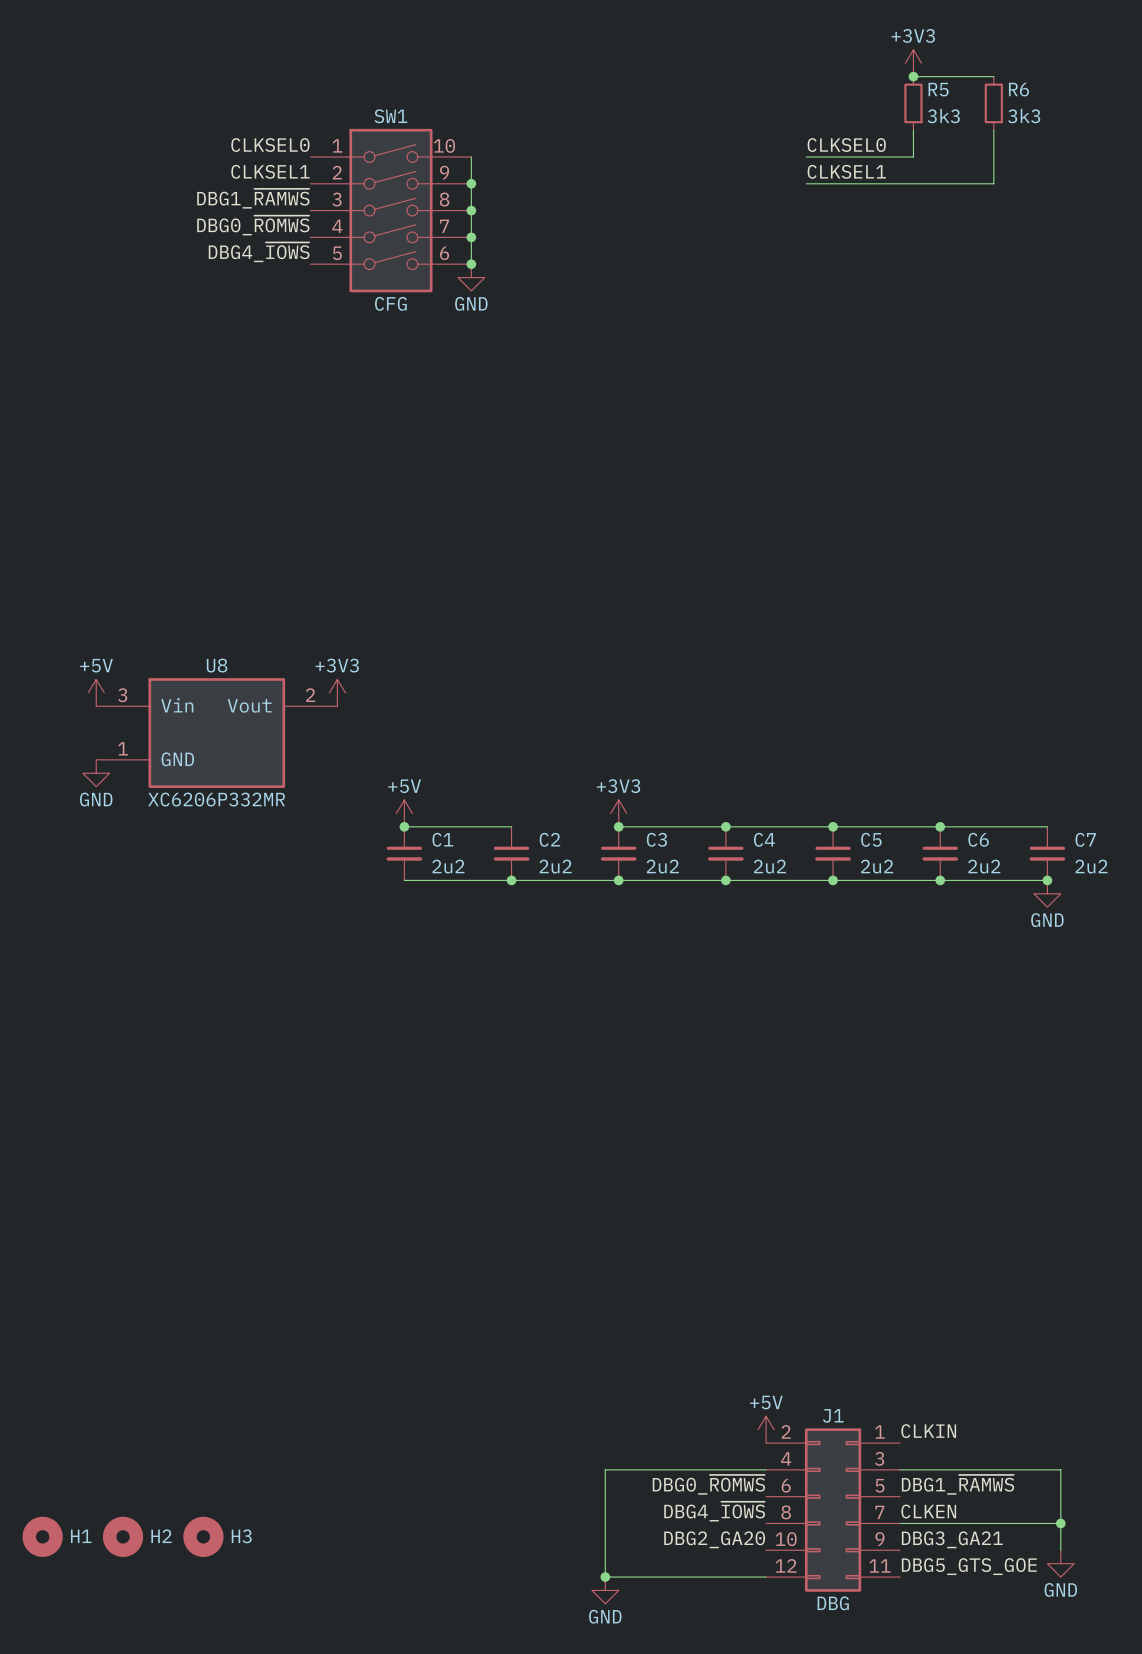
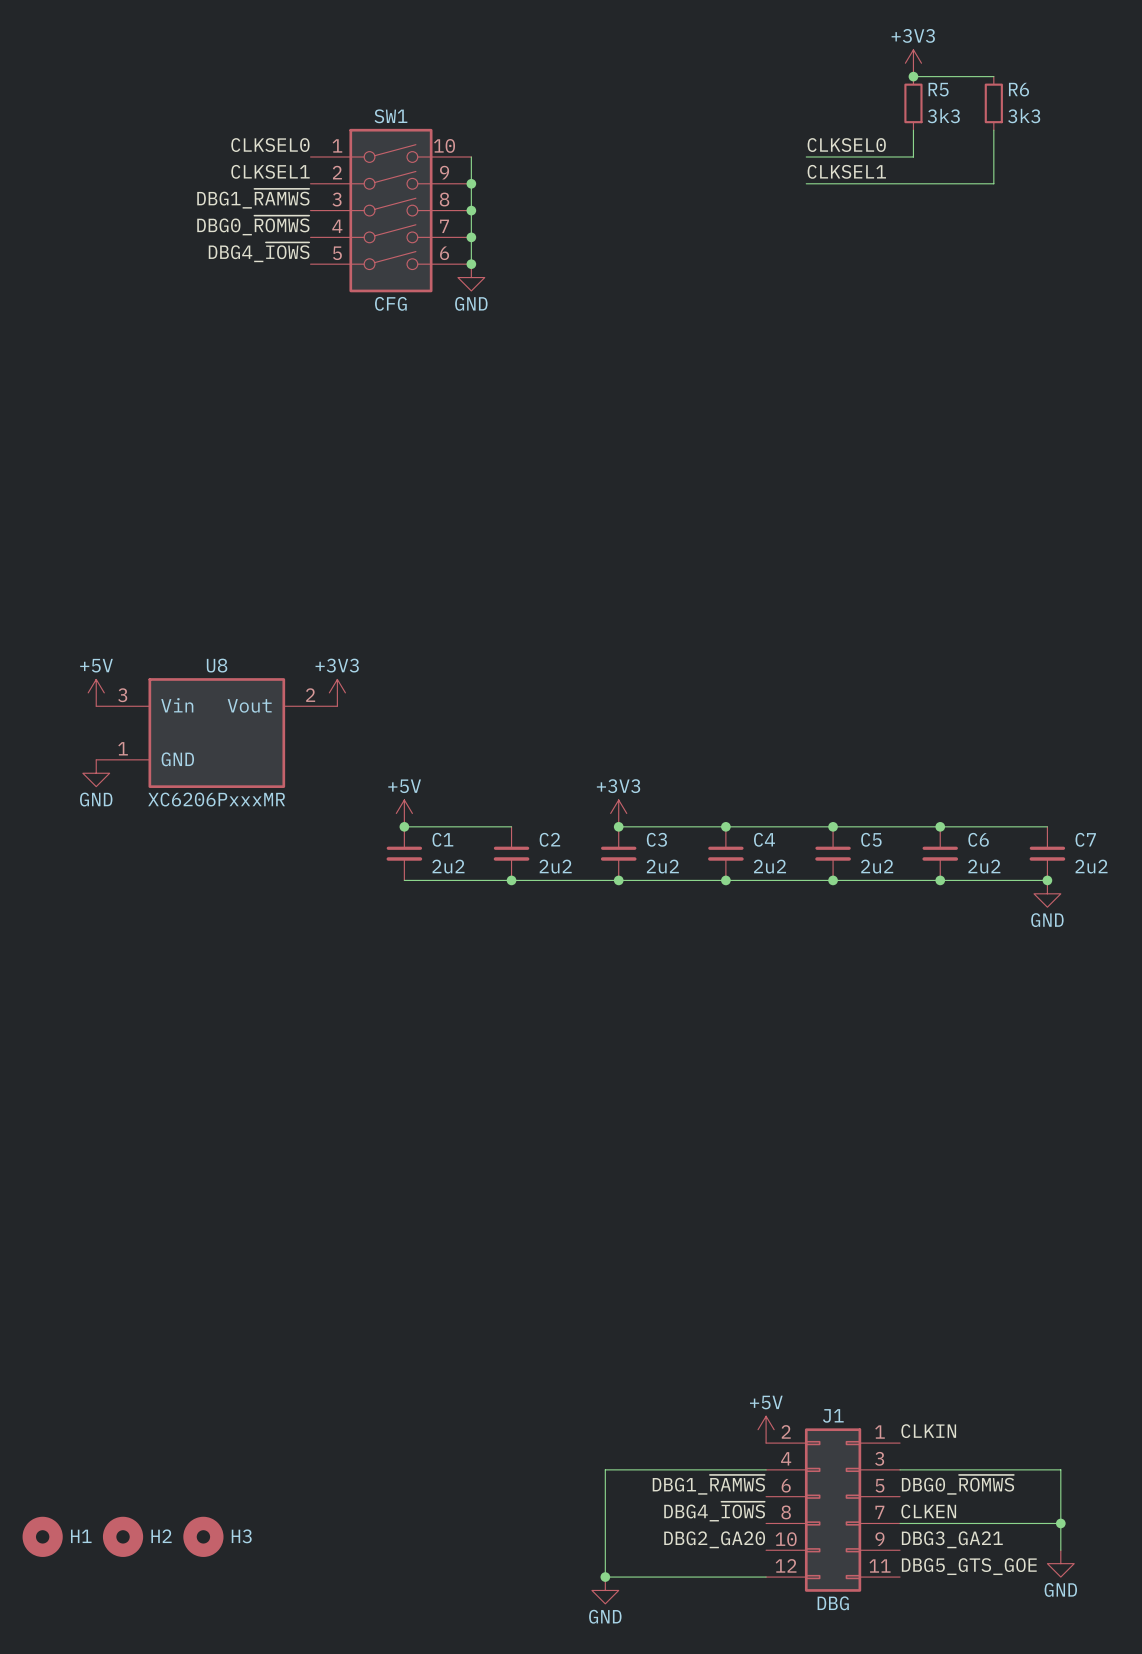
U8 value: XC6206P332MR (216, 799) -> XC6206PxxxMR (216, 799)
label: DBG0_~{ROMWS} (708, 1484) -> DBG1_~{RAMWS} (708, 1484)
label: DBG1_~{RAMWS} (957, 1484) -> DBG0_~{ROMWS} (957, 1484)

